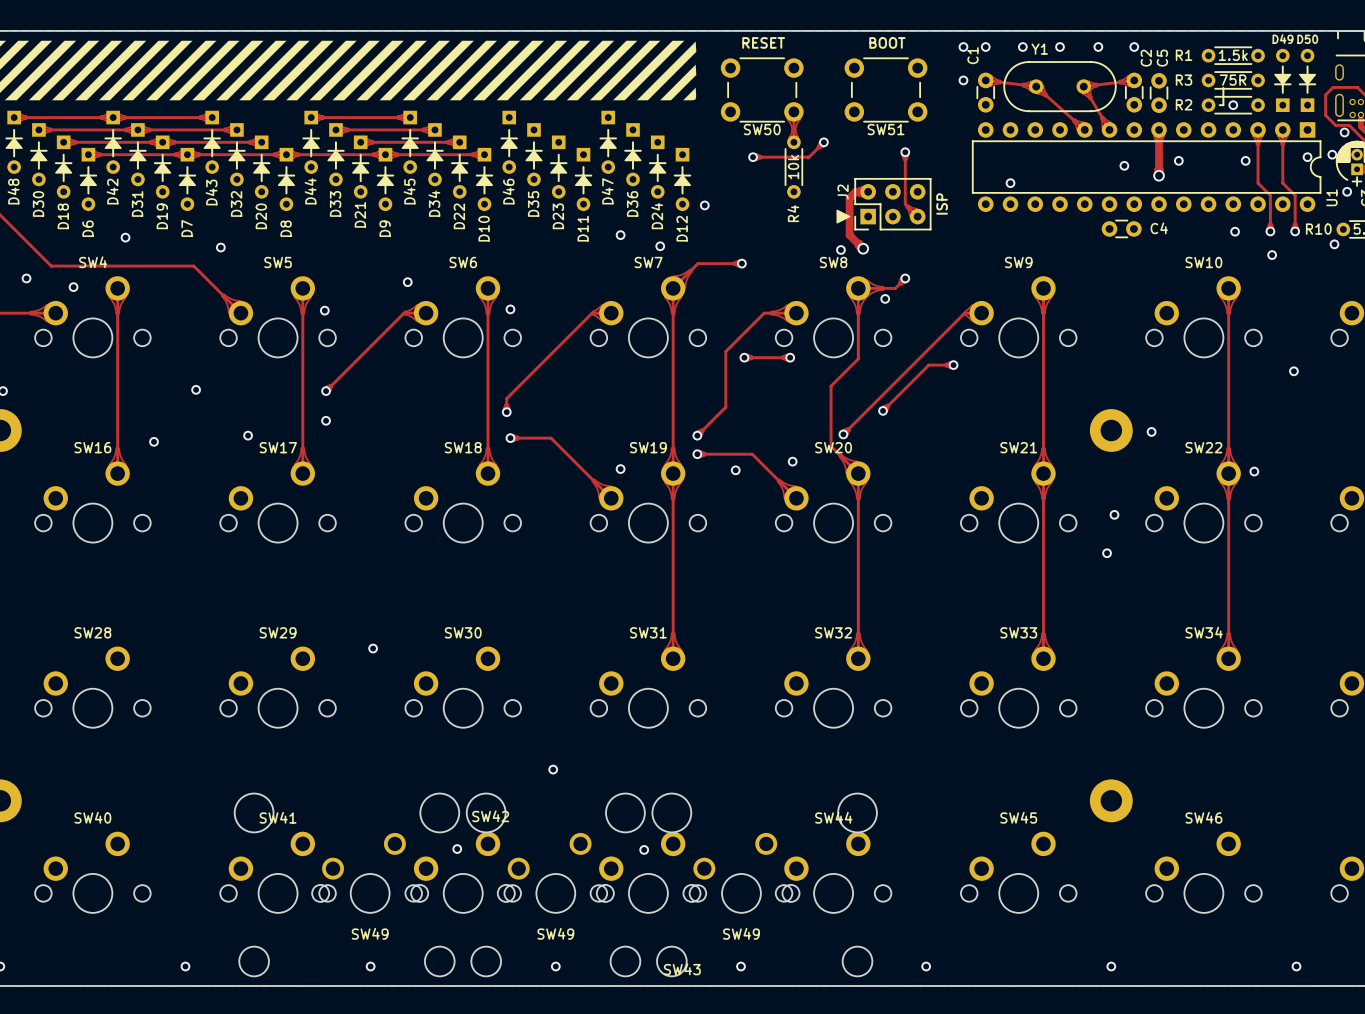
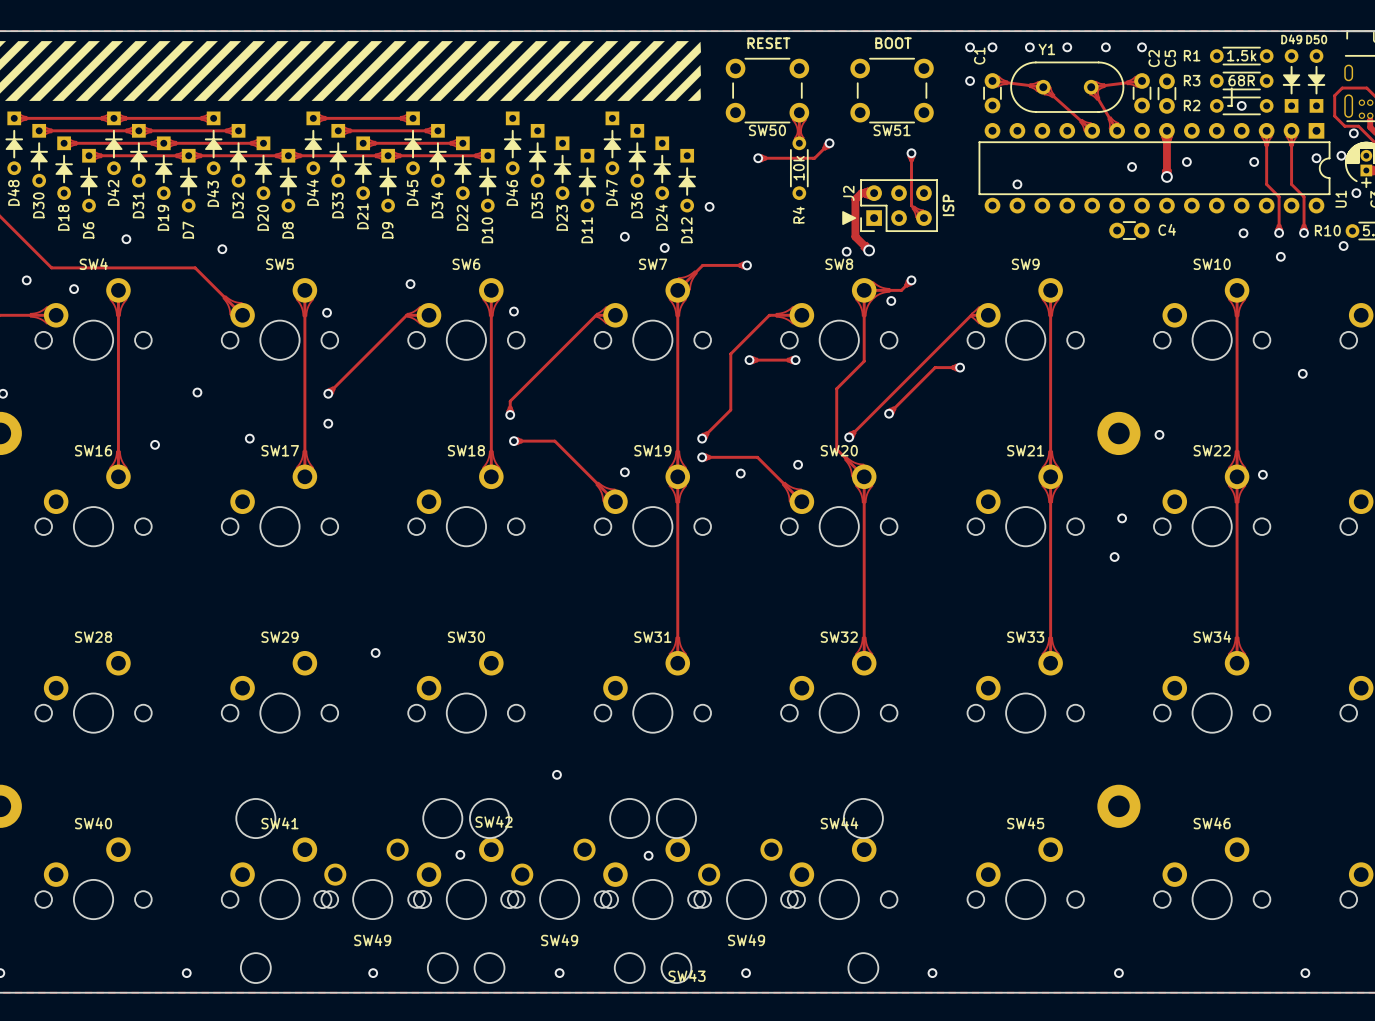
R3 value: 75R (1233, 80) -> 68R (1241, 80)

